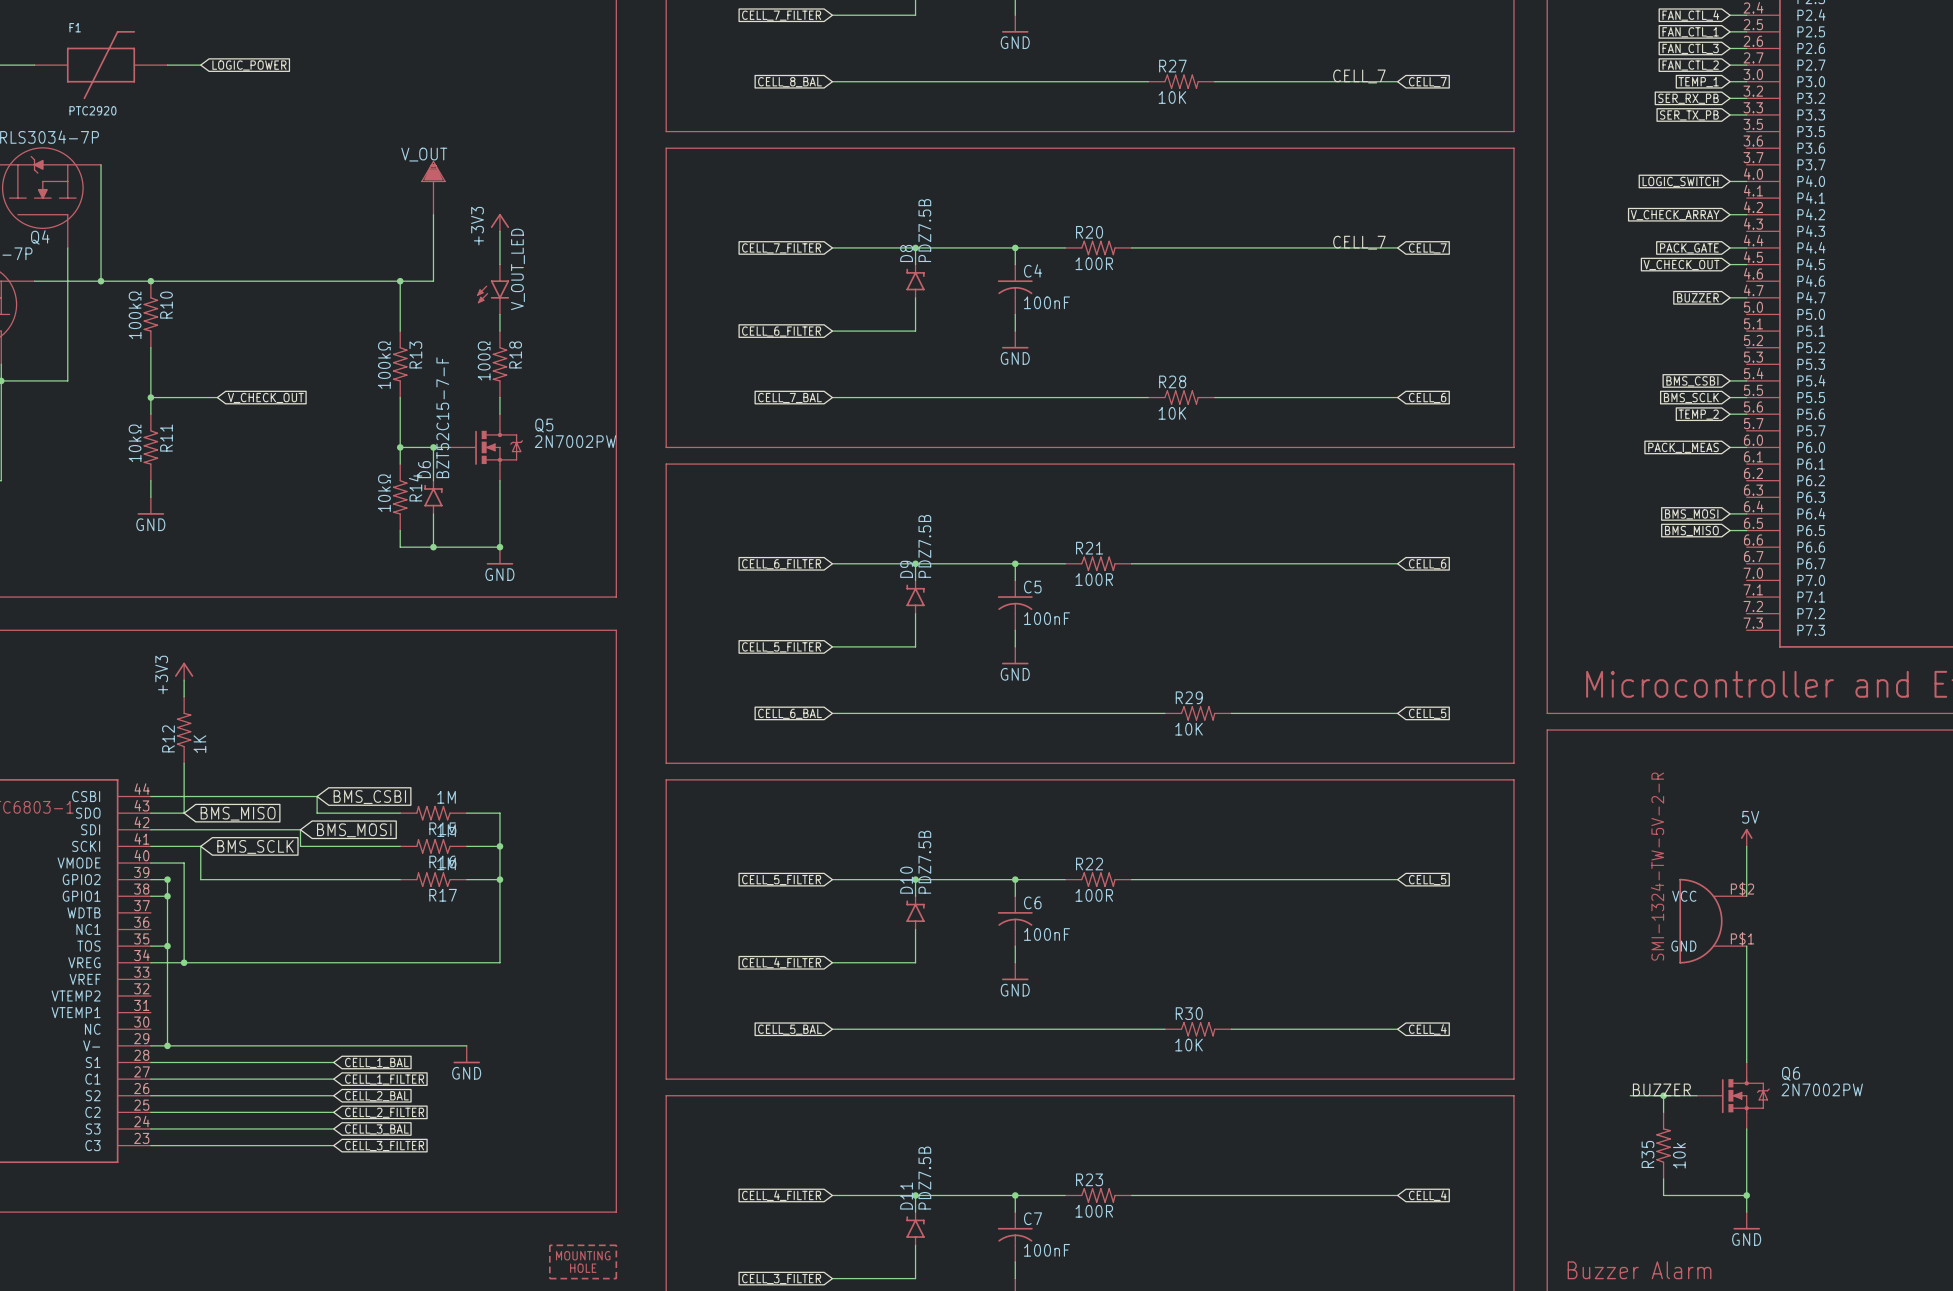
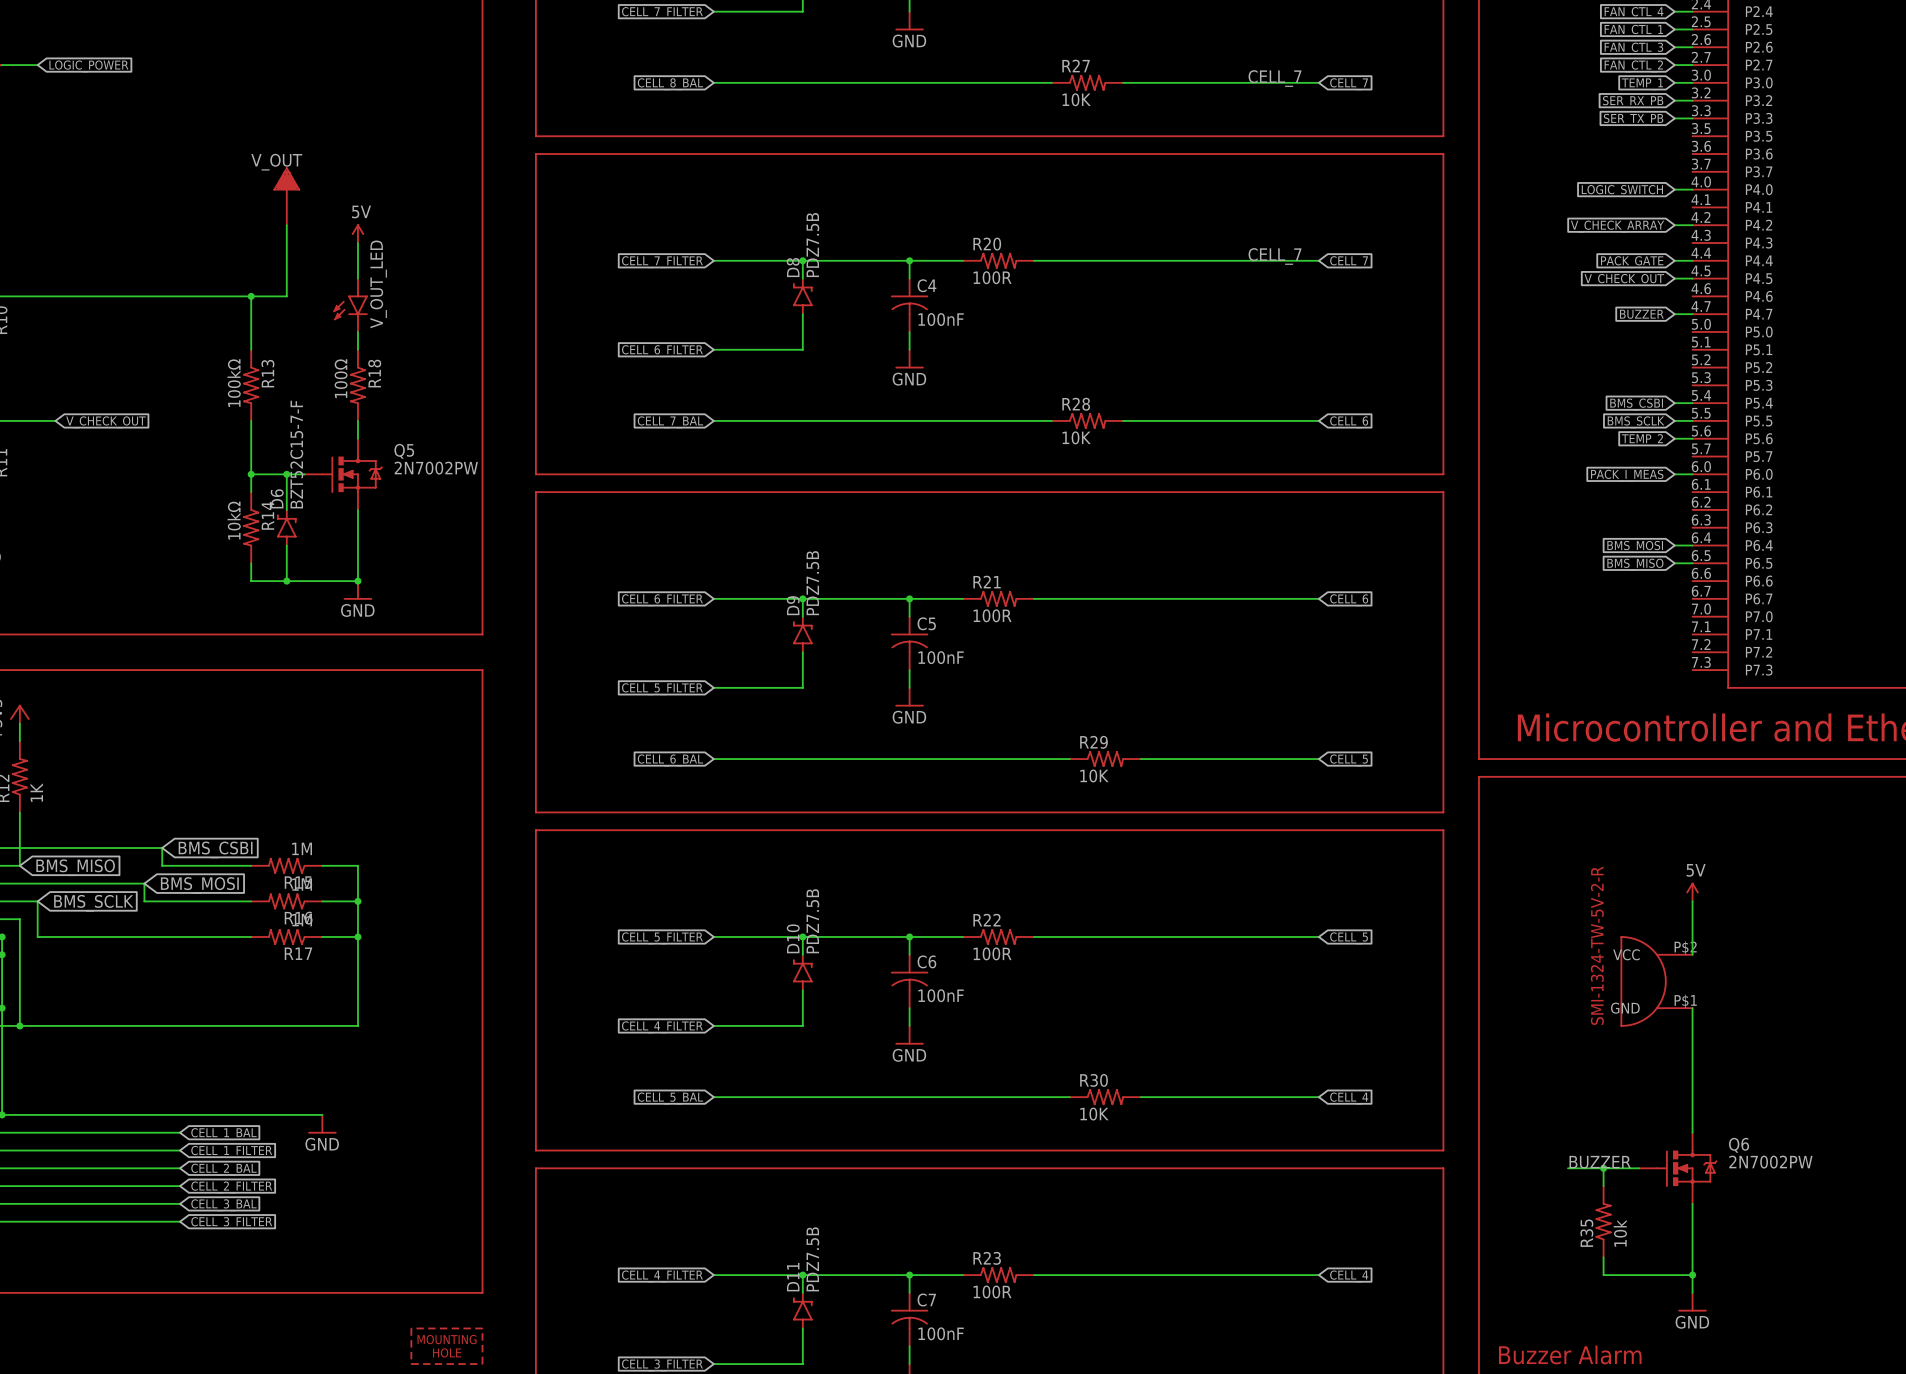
power symbol: +3V3 (499, 222) -> 5V (357, 233)

